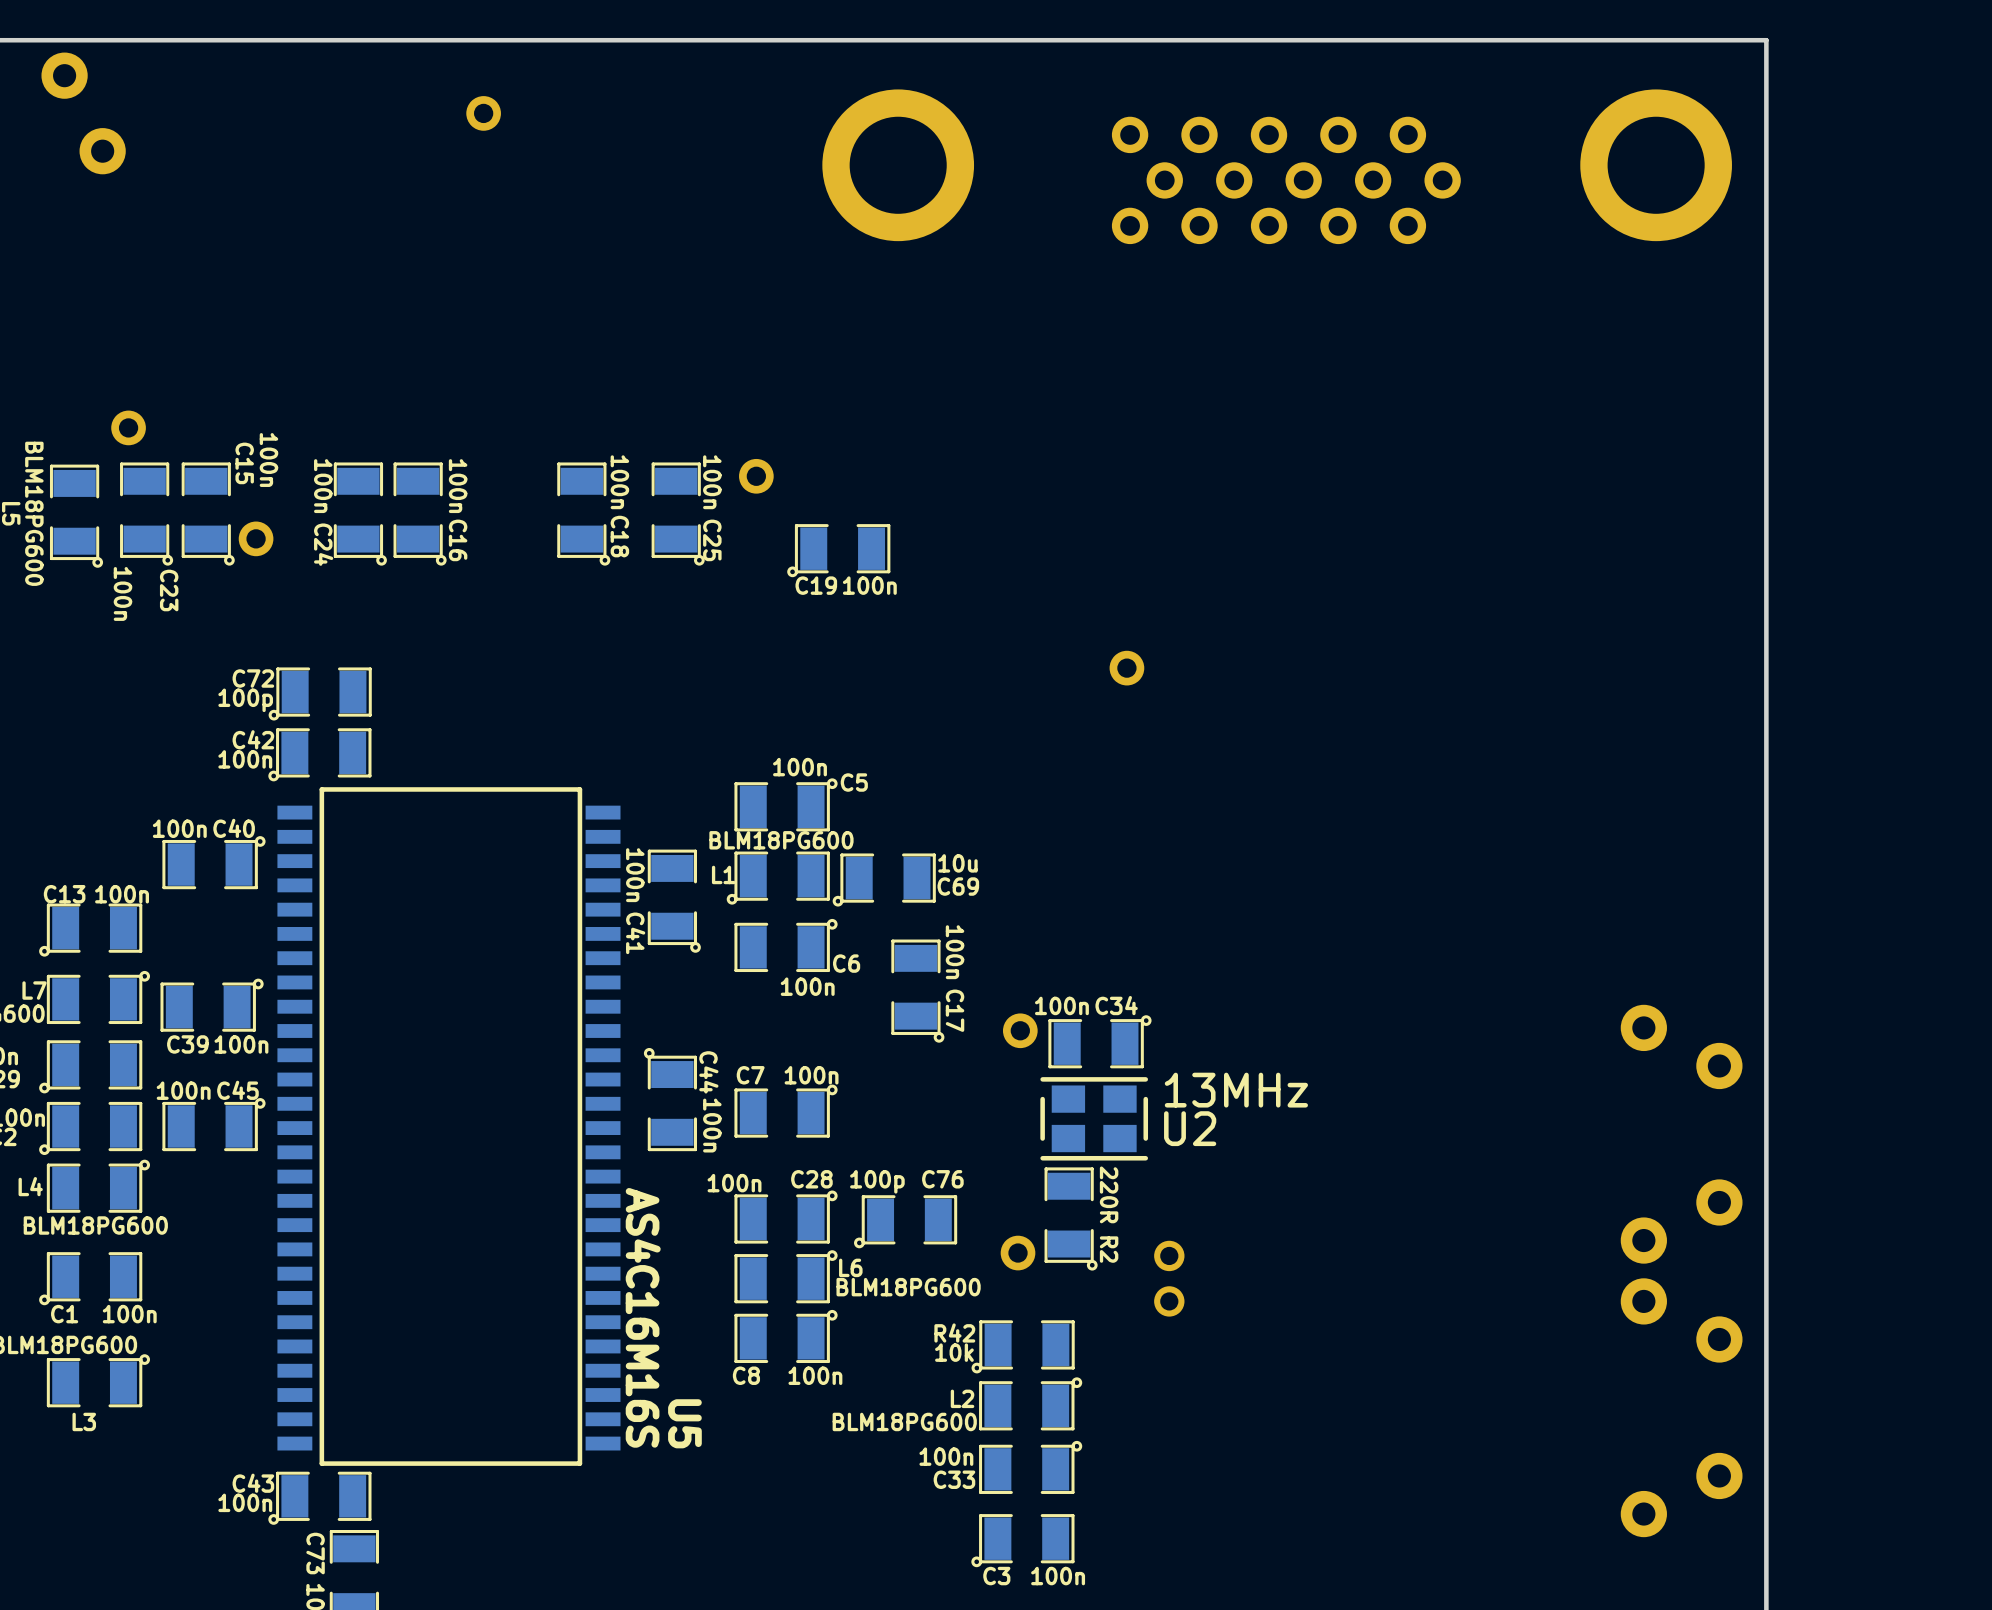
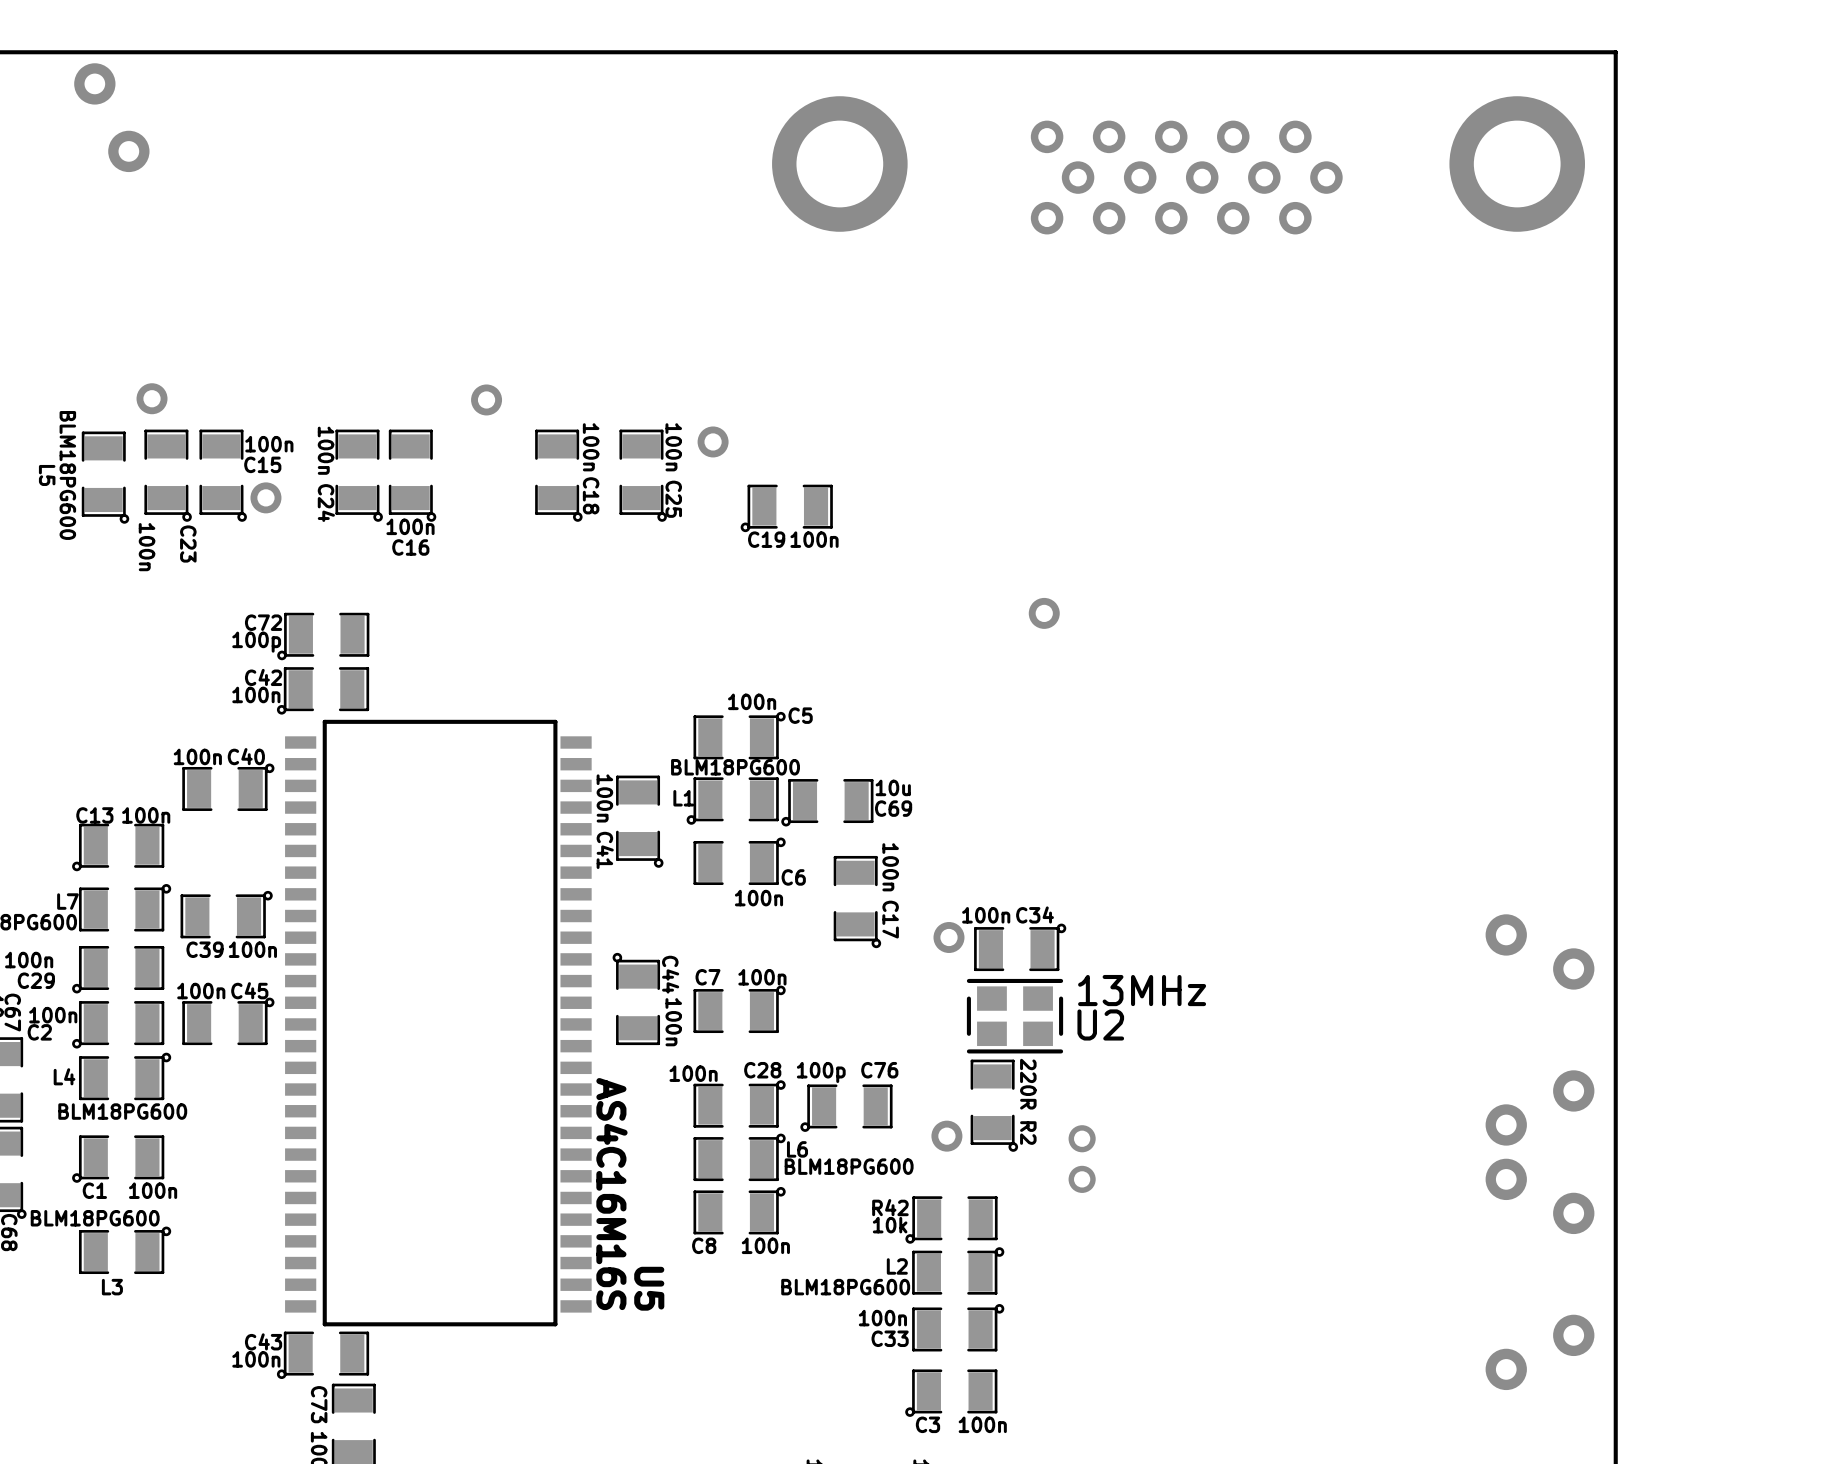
part position: (483, 113) -> (486, 399)
C15 value rotation: 0° (268, 460) -> 90° counterclockwise (269, 444)
C15 name rotation: 0° (244, 463) -> 90° counterclockwise (262, 464)
C16 value rotation: 0° (458, 486) -> 90° counterclockwise (410, 526)
C16 value position: 100n (458, 486) -> 100n (410, 526)
C16 name rotation: 0° (458, 540) -> 90° counterclockwise (410, 547)
C16 name position: C16 (458, 540) -> C16 (410, 547)

